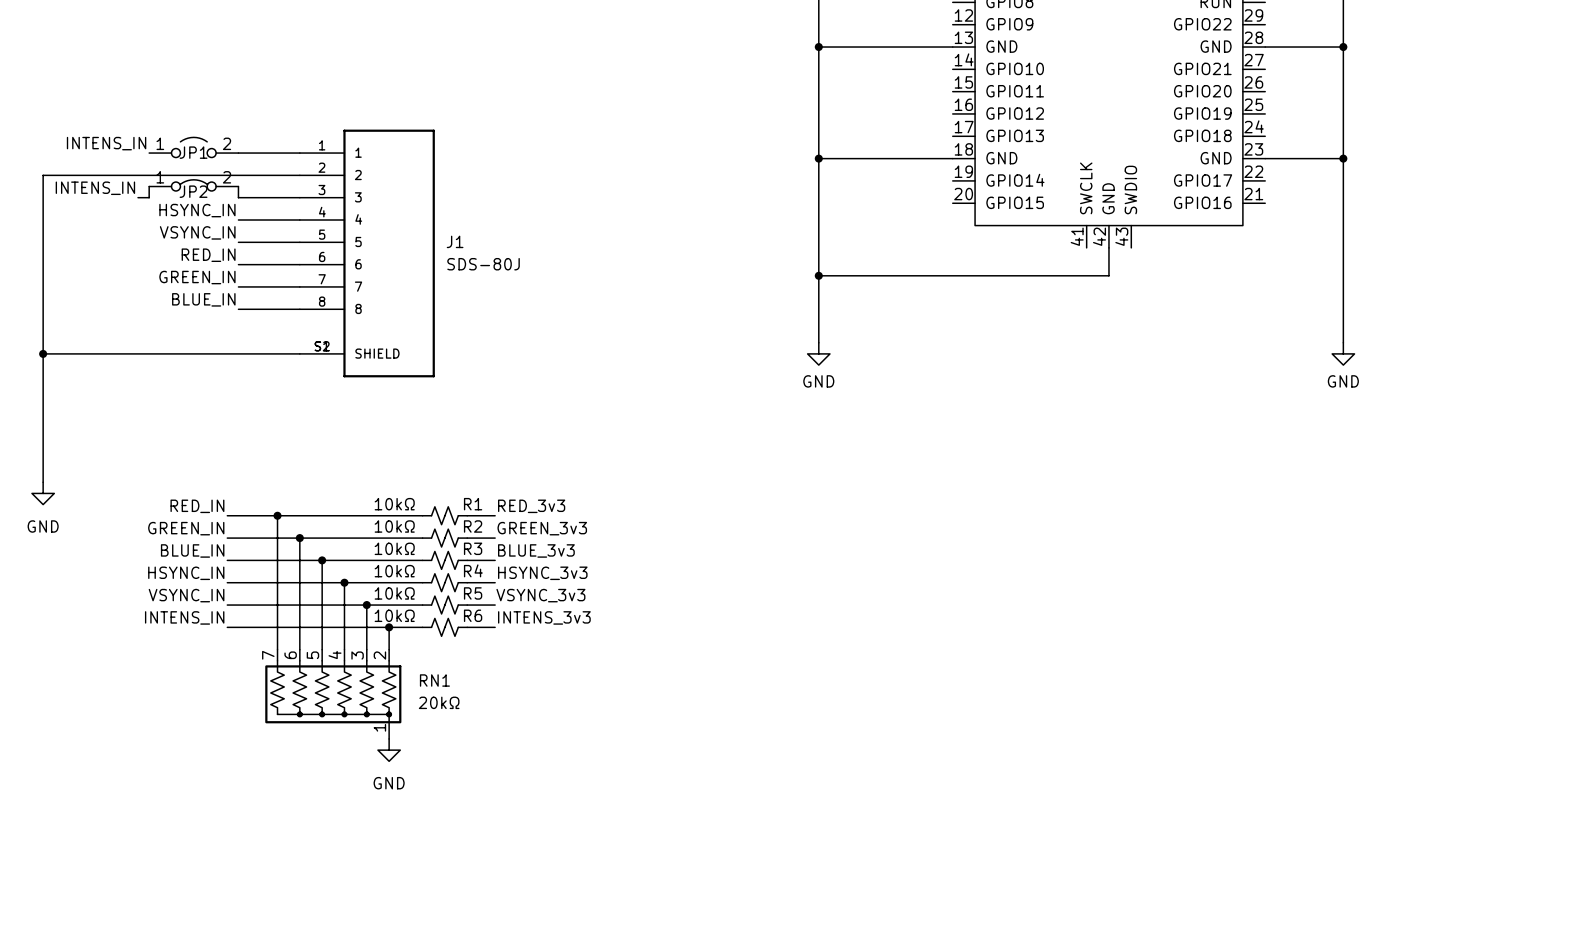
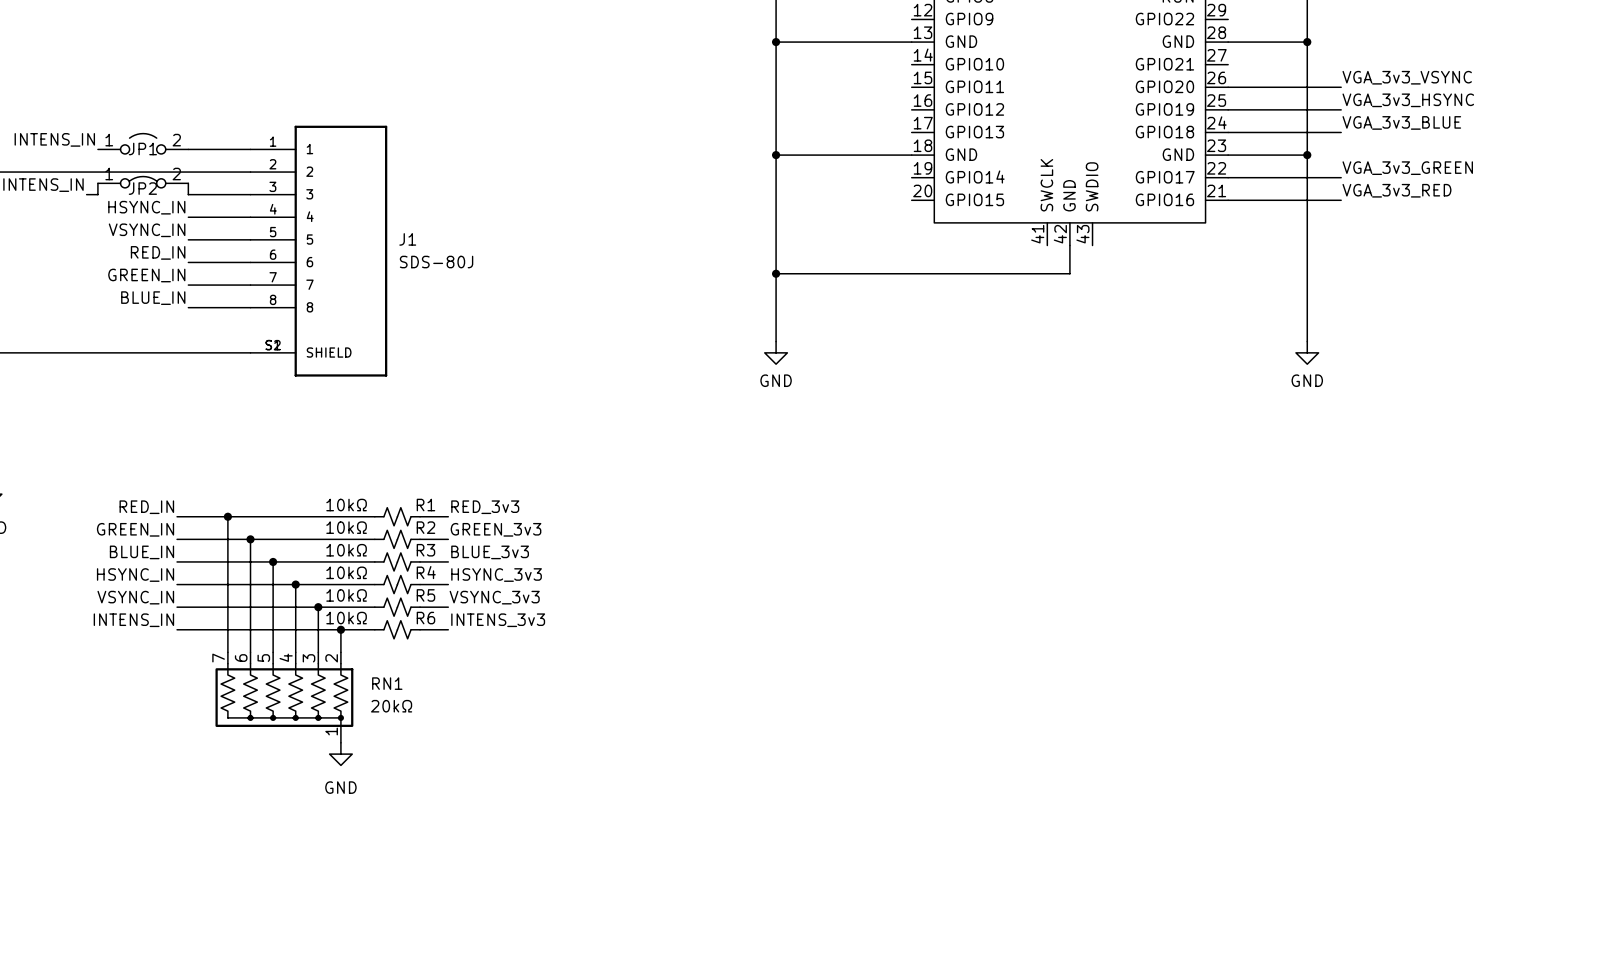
label: none -> VGA_3v3_VSYNC (1407, 77)
wire: none -> (1228, 87) (1341, 87)
label: none -> VGA_3v3_HSYNC (1408, 100)
wire: none -> (1228, 109) (1341, 109)
label: none -> VGA_3v3_BLUE (1401, 122)
wire: none -> (1228, 132) (1341, 132)
label: none -> VGA_3v3_GREEN (1407, 168)
wire: none -> (1228, 177) (1341, 177)
label: none -> VGA_3v3_RED (1396, 190)
wire: none -> (1228, 200) (1341, 200)

